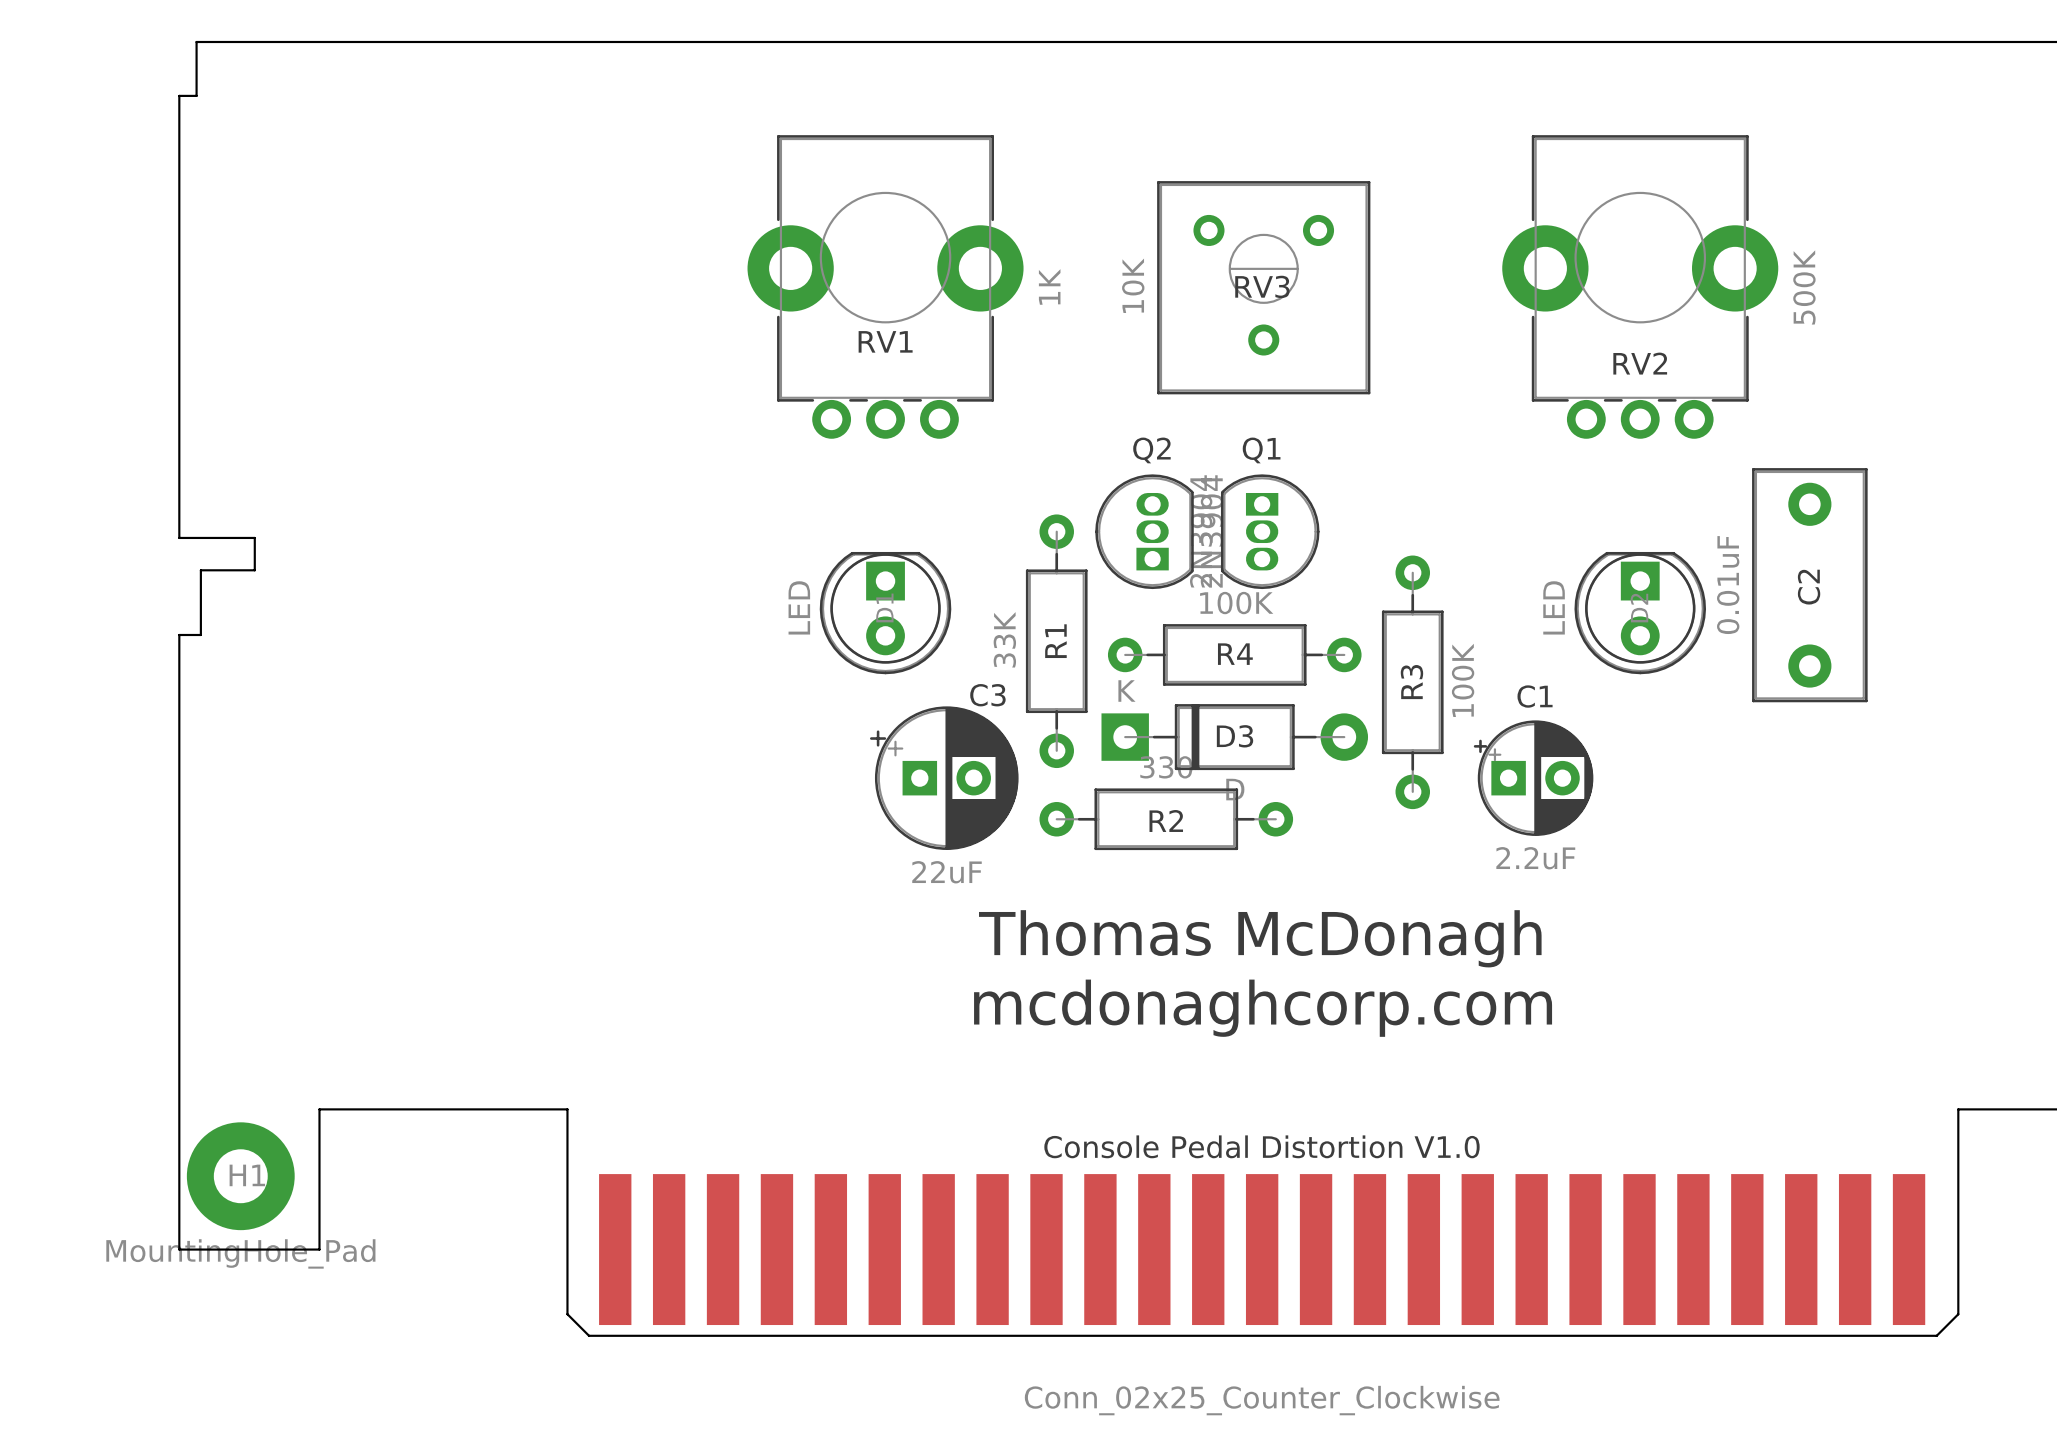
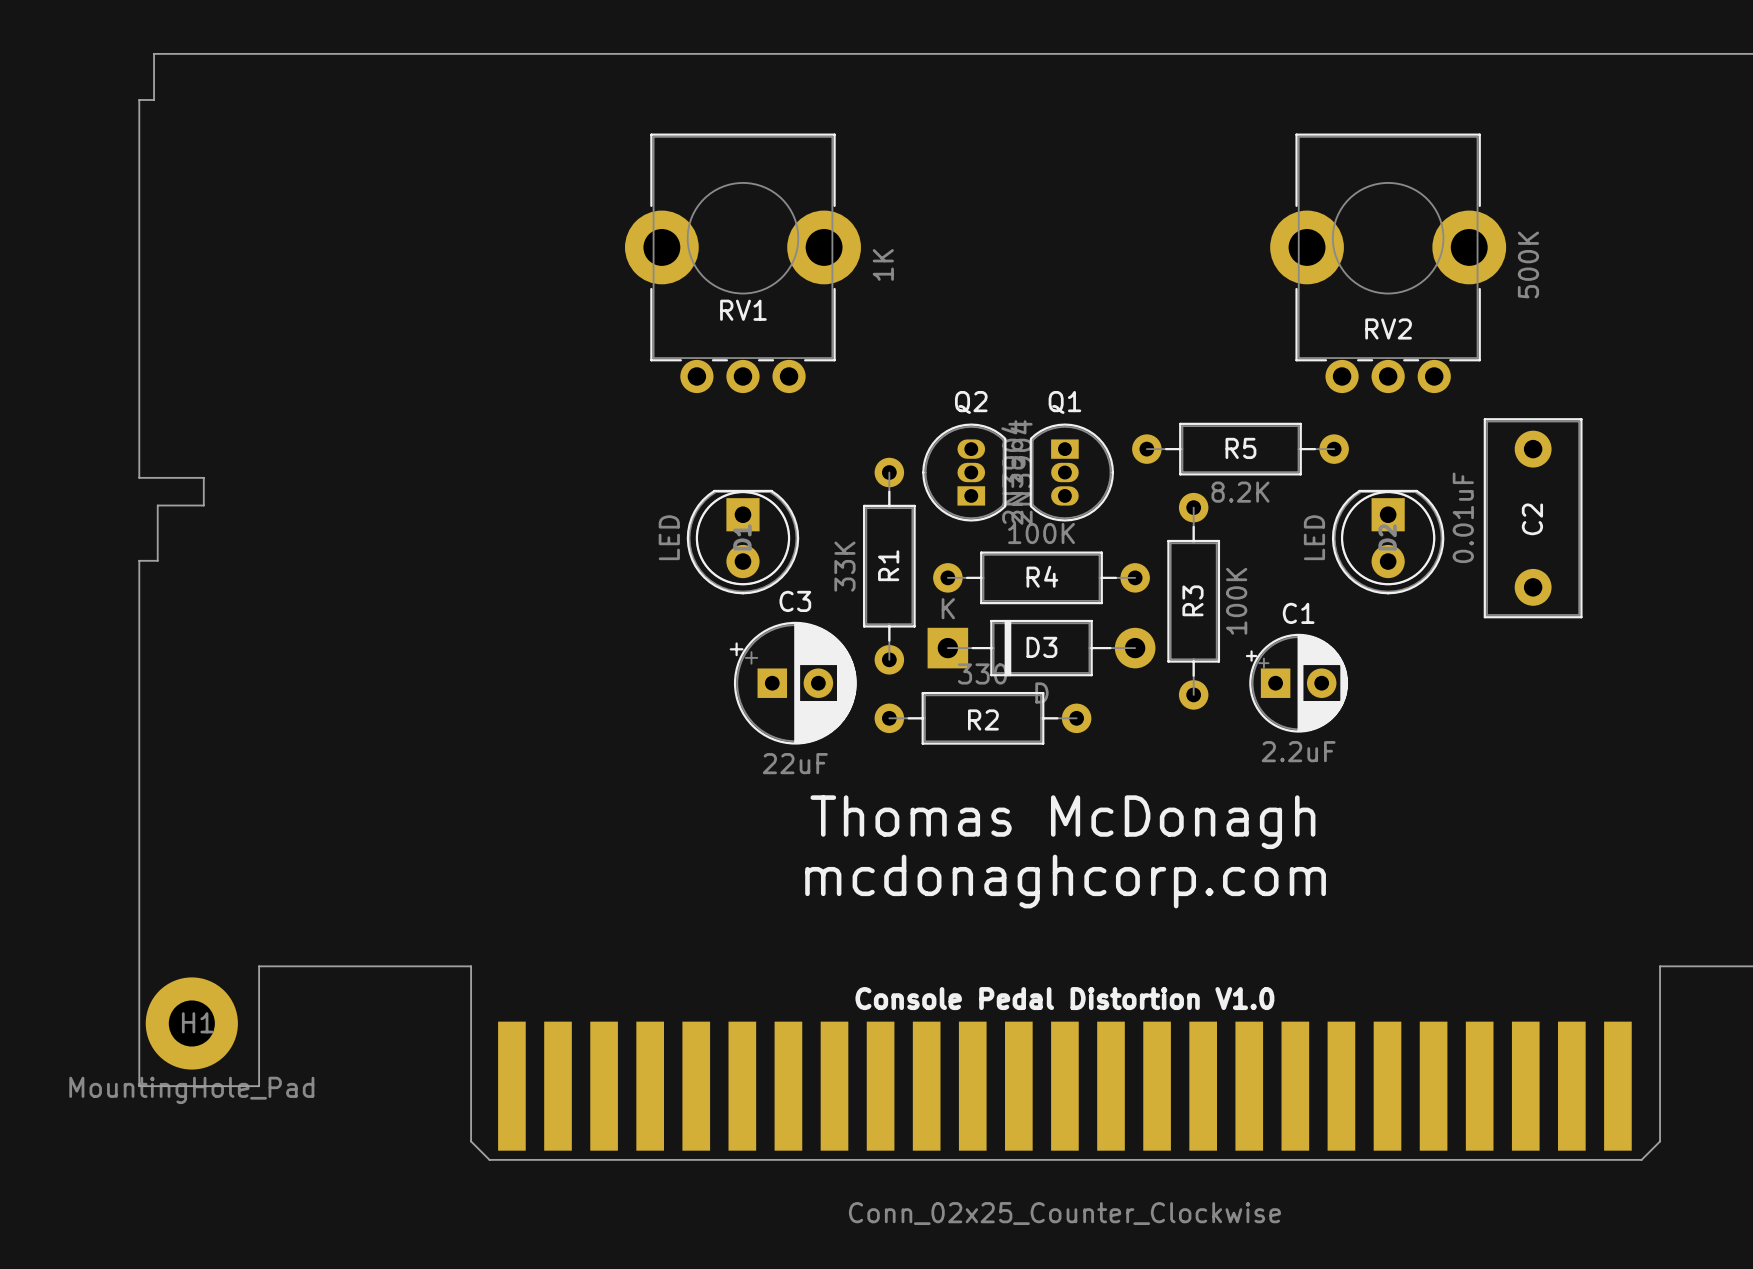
RV3: 10K (1263, 287) -> none
R5: none -> 8.2K (1240, 449)
C3 name position: C3 (987, 695) -> C3 (795, 601)

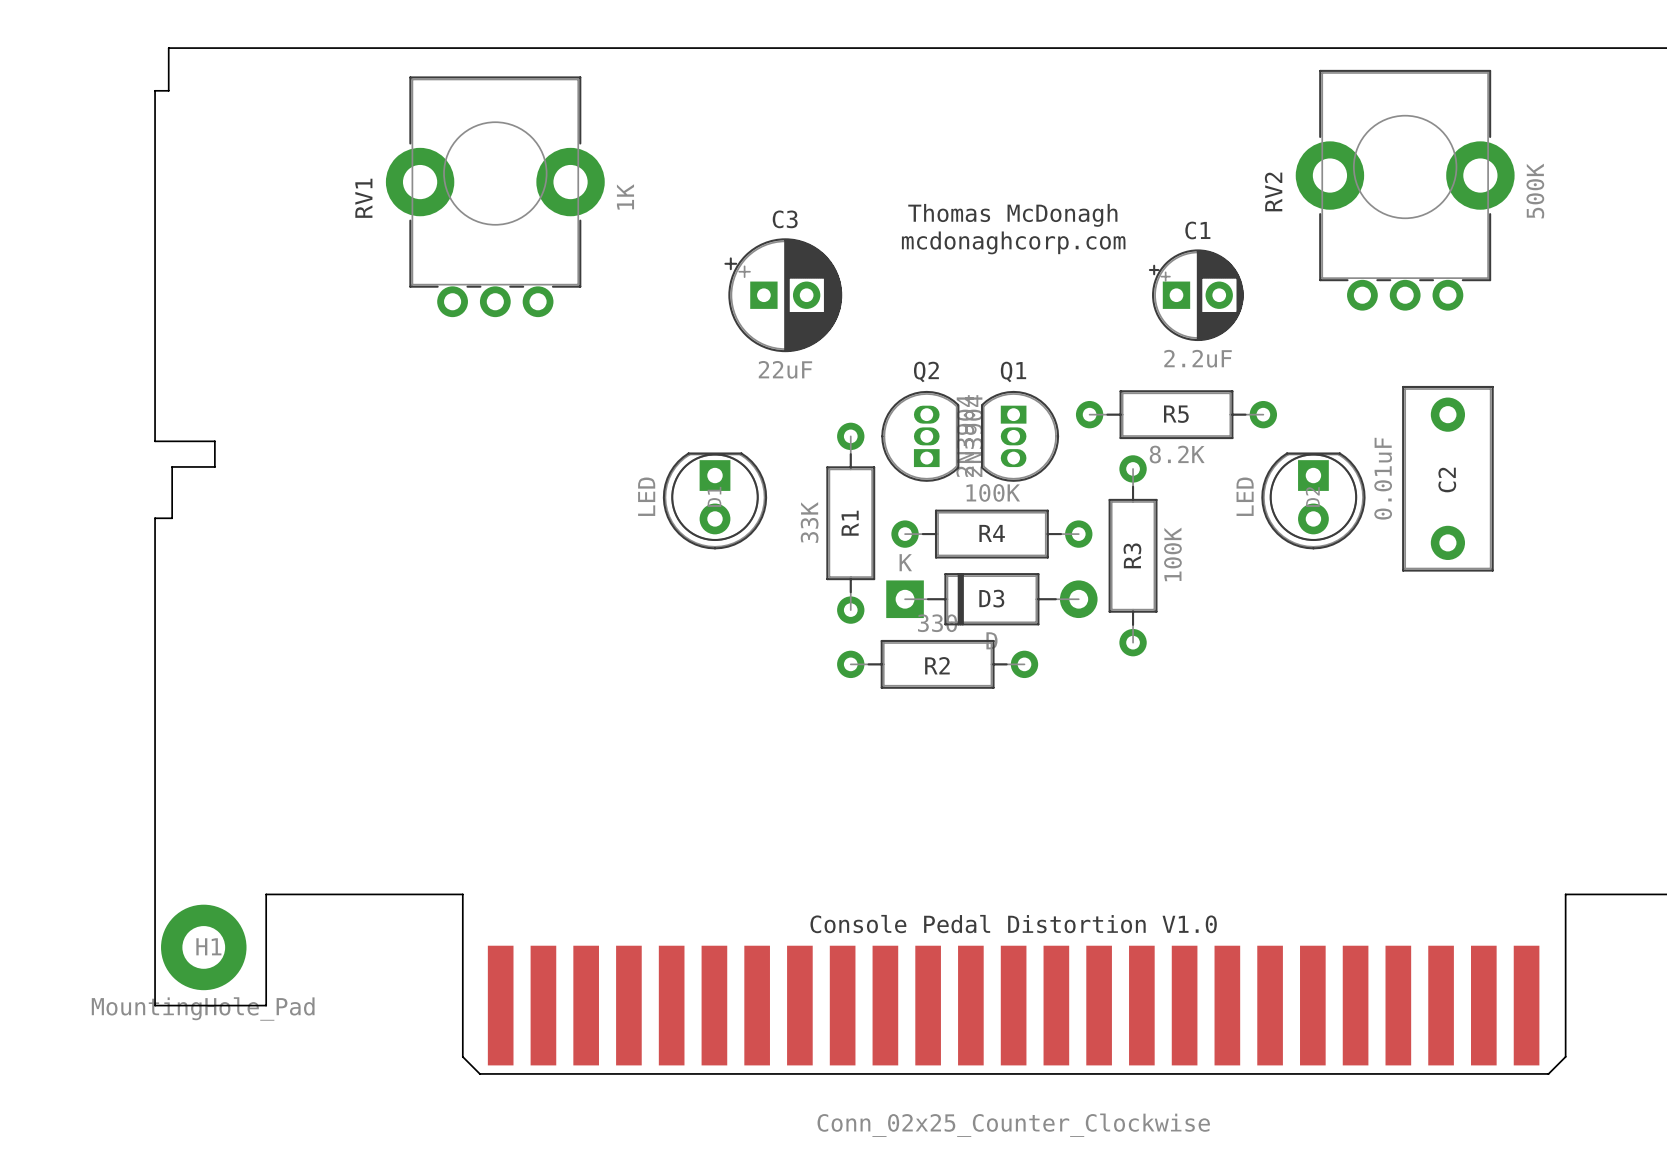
text: none -> Thomas McDonagh (1012, 215)
RV1 position: (742, 263) -> (495, 196)
RV2 position: (1388, 263) -> (1405, 190)
text: none -> mcdonaghcorp.com (1013, 242)
RV1 name rotation: 0° (743, 310) -> 90° counterclockwise (363, 198)
RV1 name position: RV1 (743, 310) -> RV1 (363, 198)
RV2 name rotation: 0° (1388, 328) -> 90° counterclockwise (1273, 191)
RV2 name position: RV2 (1388, 328) -> RV2 (1273, 191)
C3 position: (793, 683) -> (783, 295)
C1 position: (1296, 683) -> (1196, 295)
text: Thomas McDonagh (1062, 822) -> none
text: mcdonaghcorp.com (1065, 881) -> none

